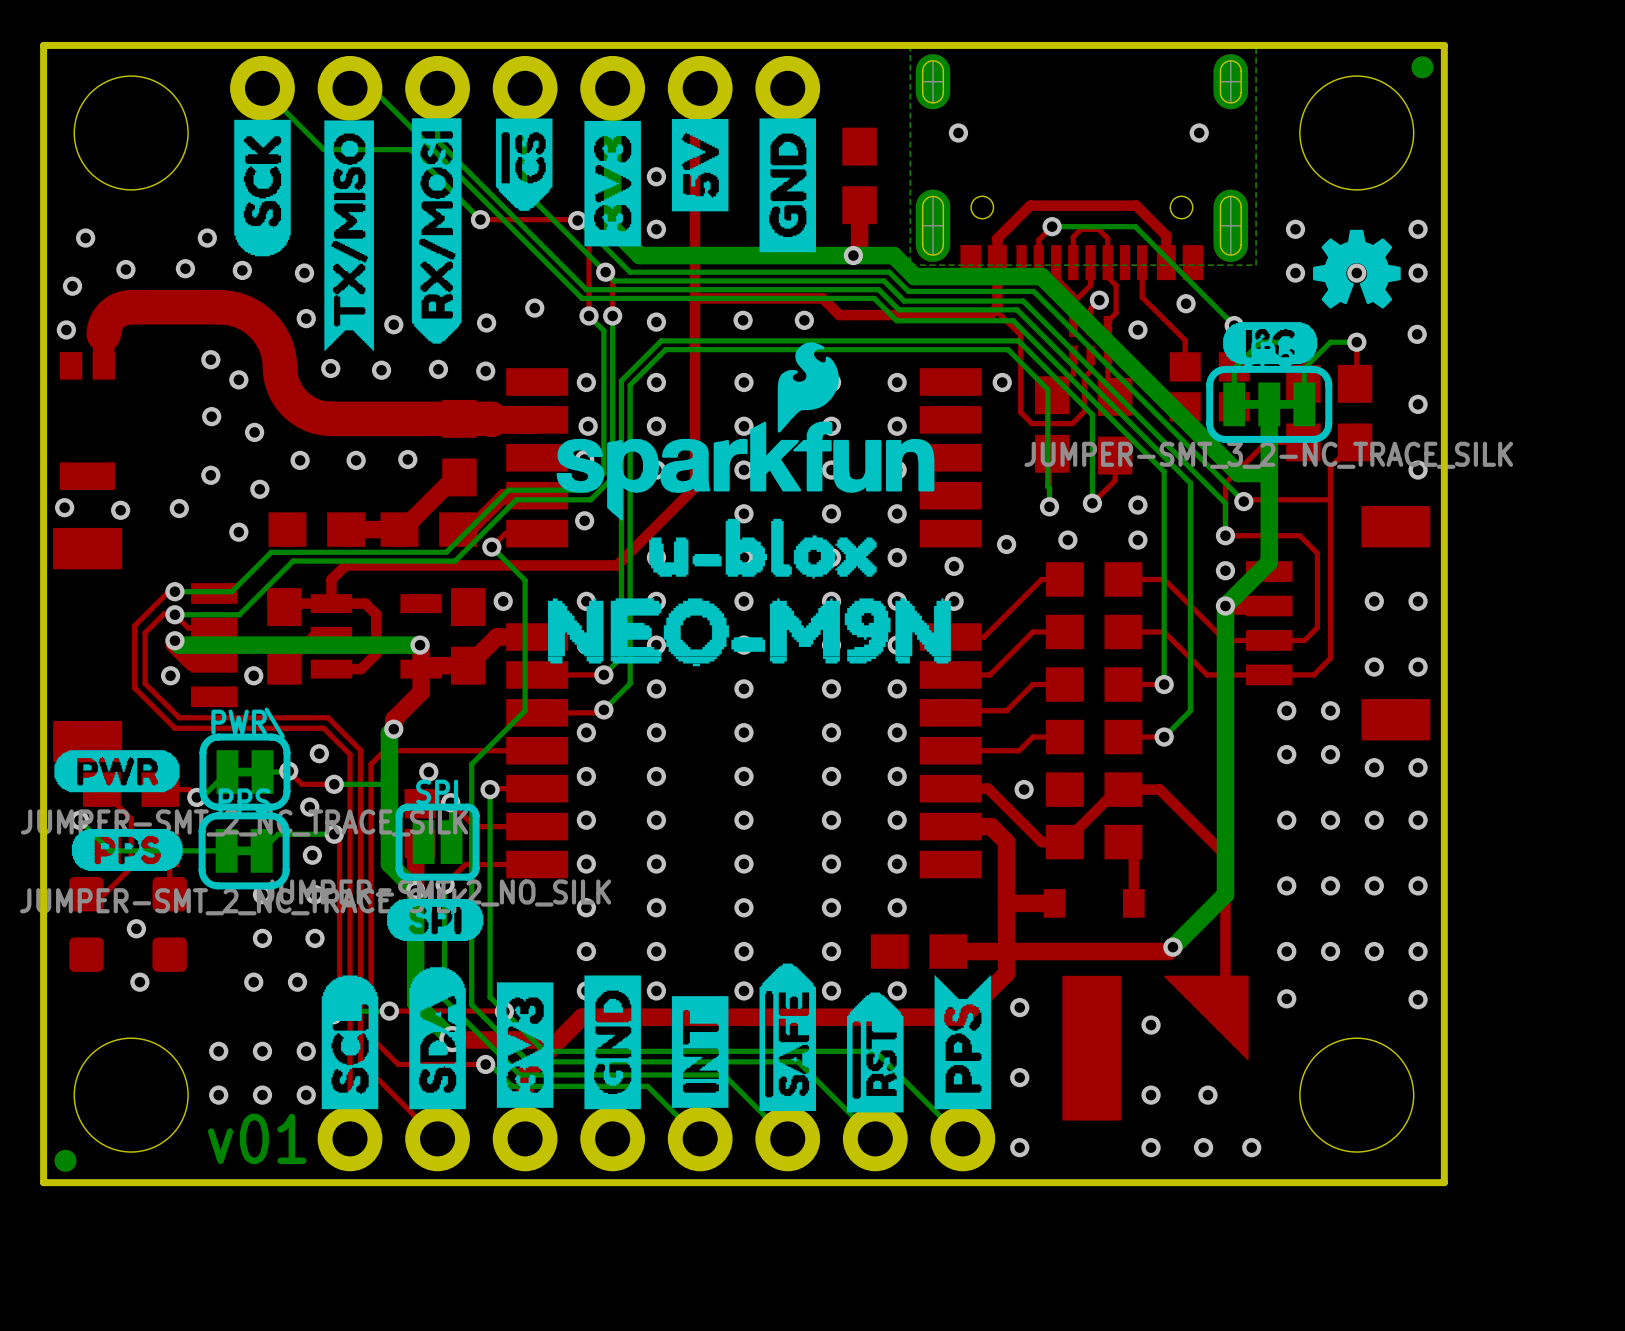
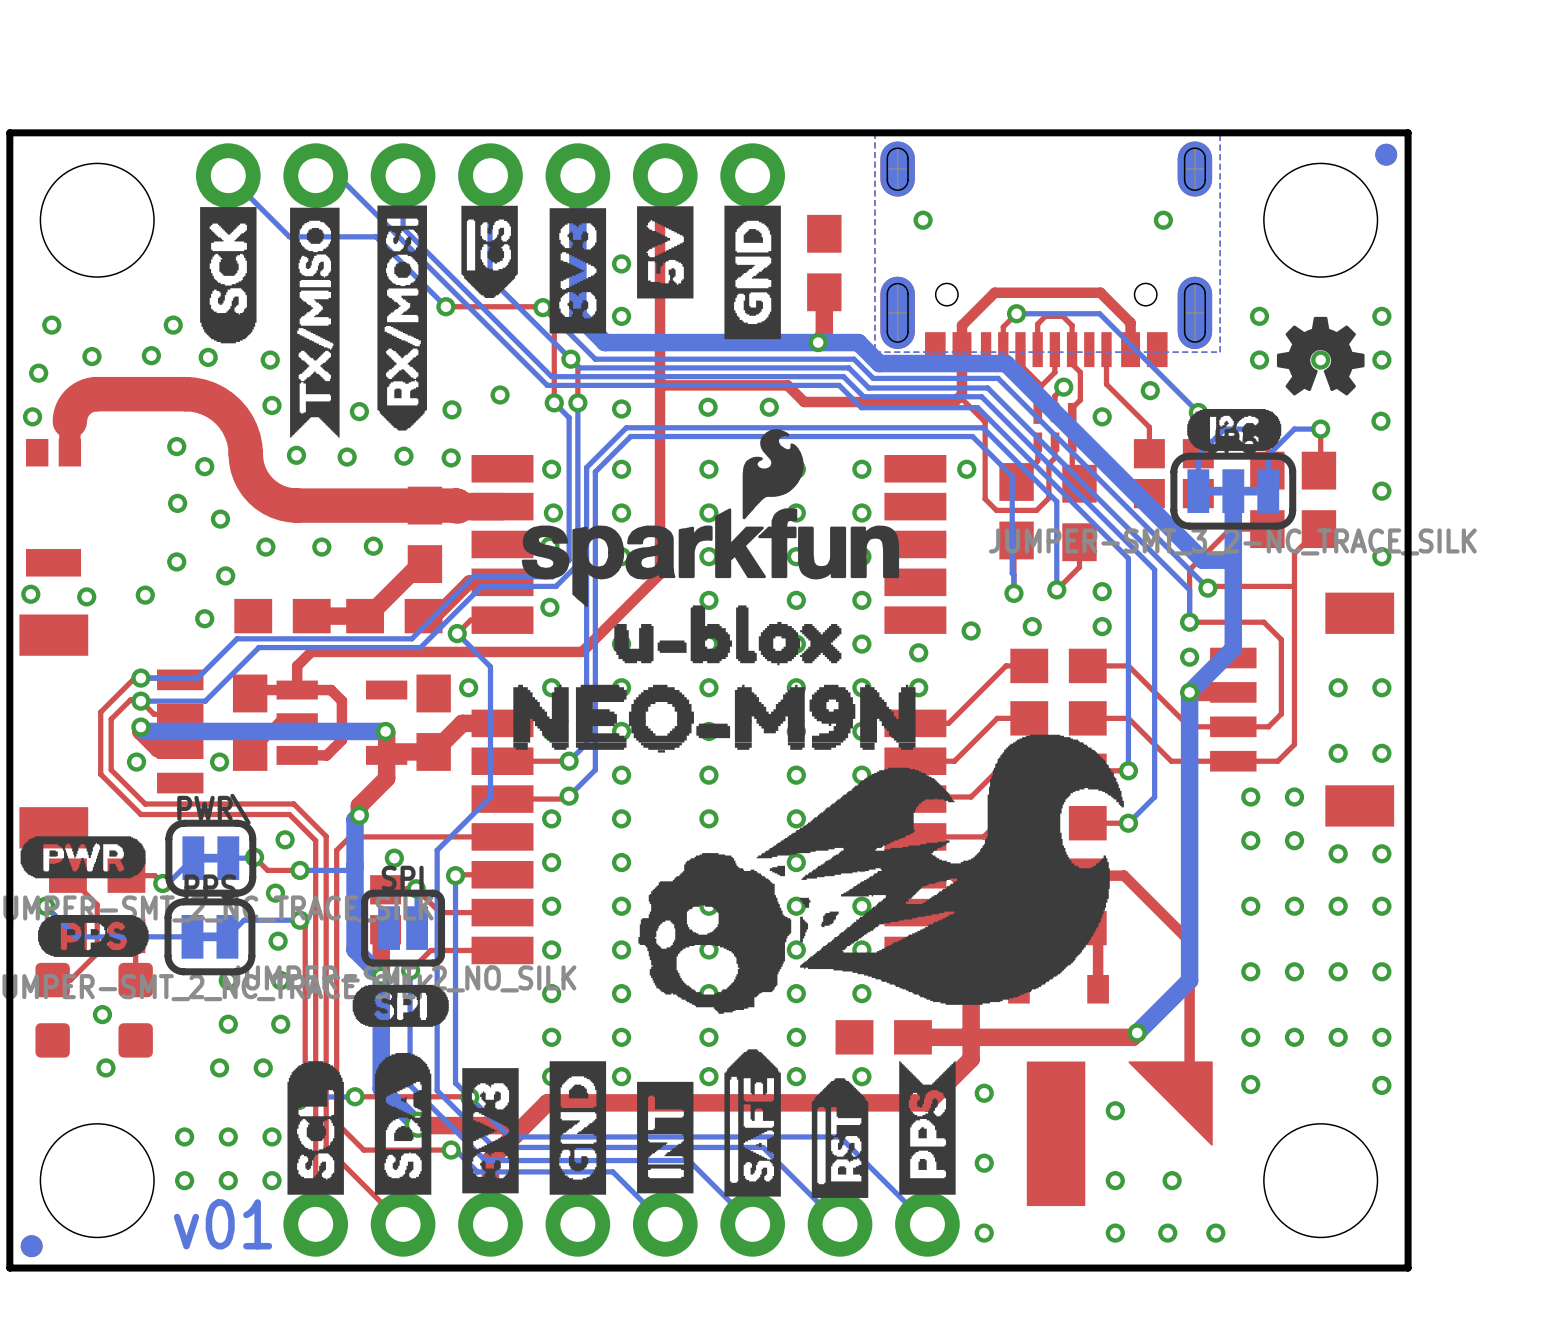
drawing: none -> [638, 734, 1124, 1014]

